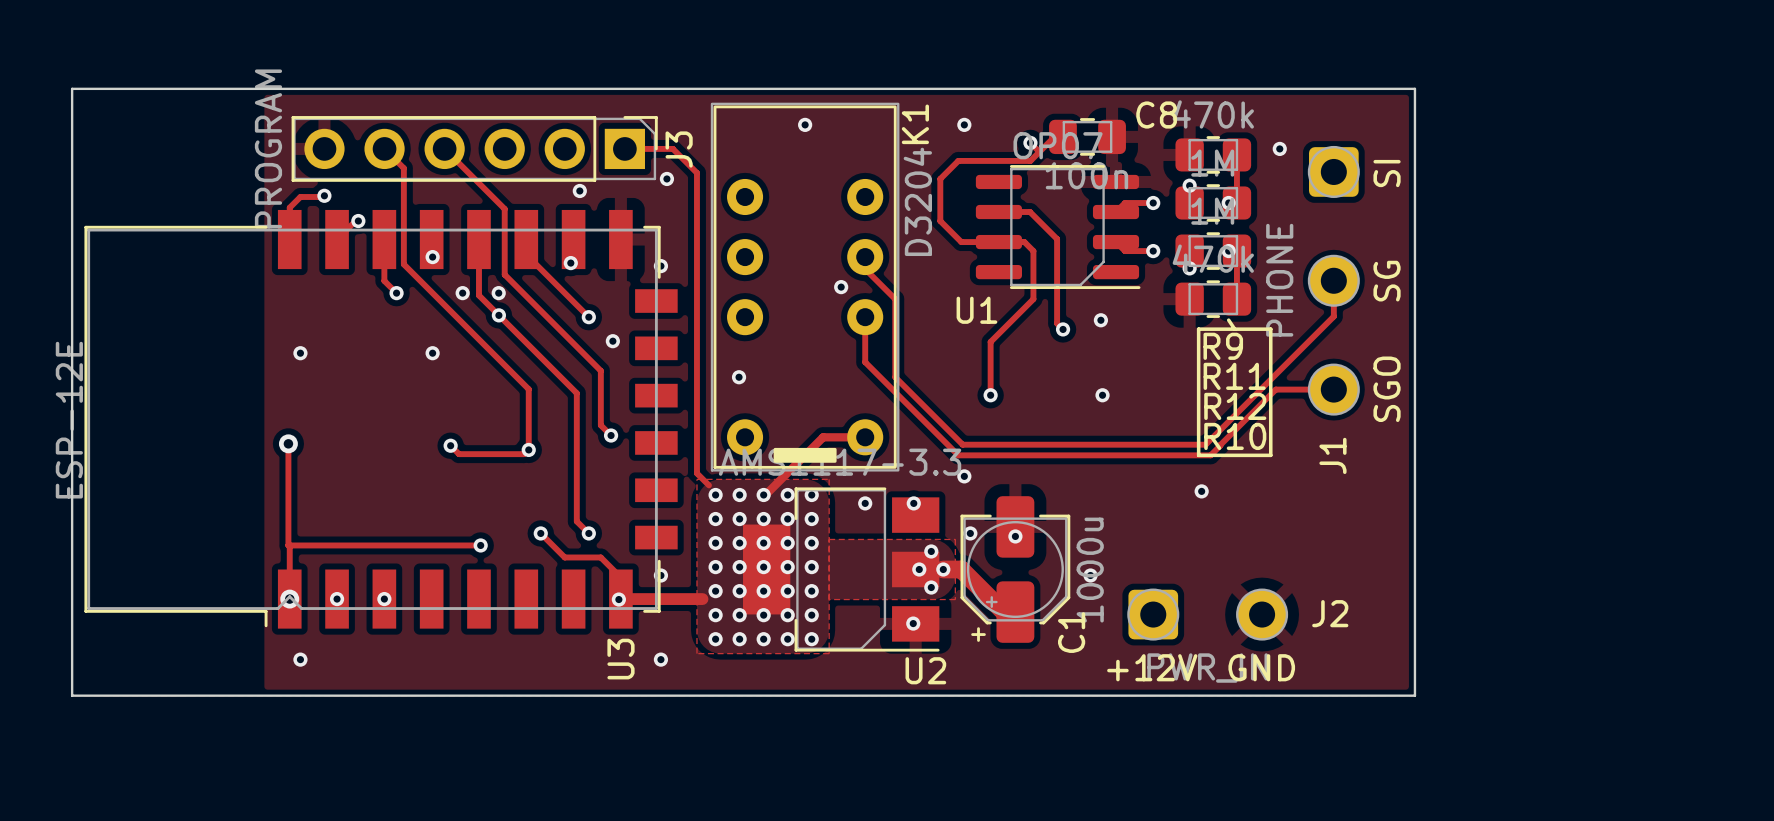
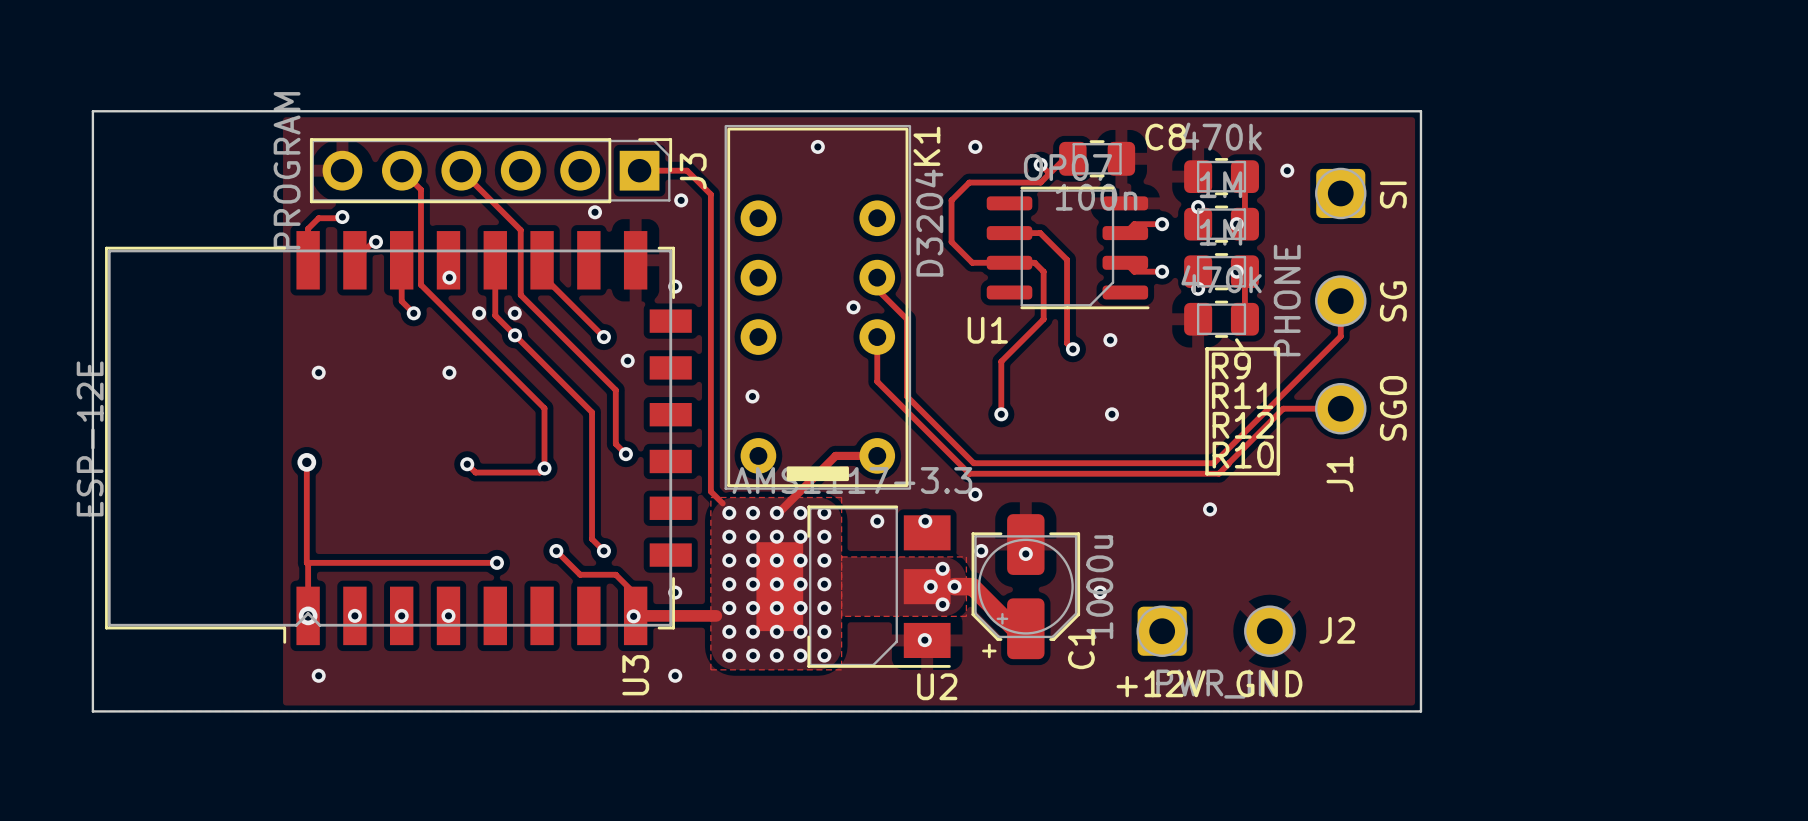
via: (570, 263) -> none
via: none -> (448, 615)

